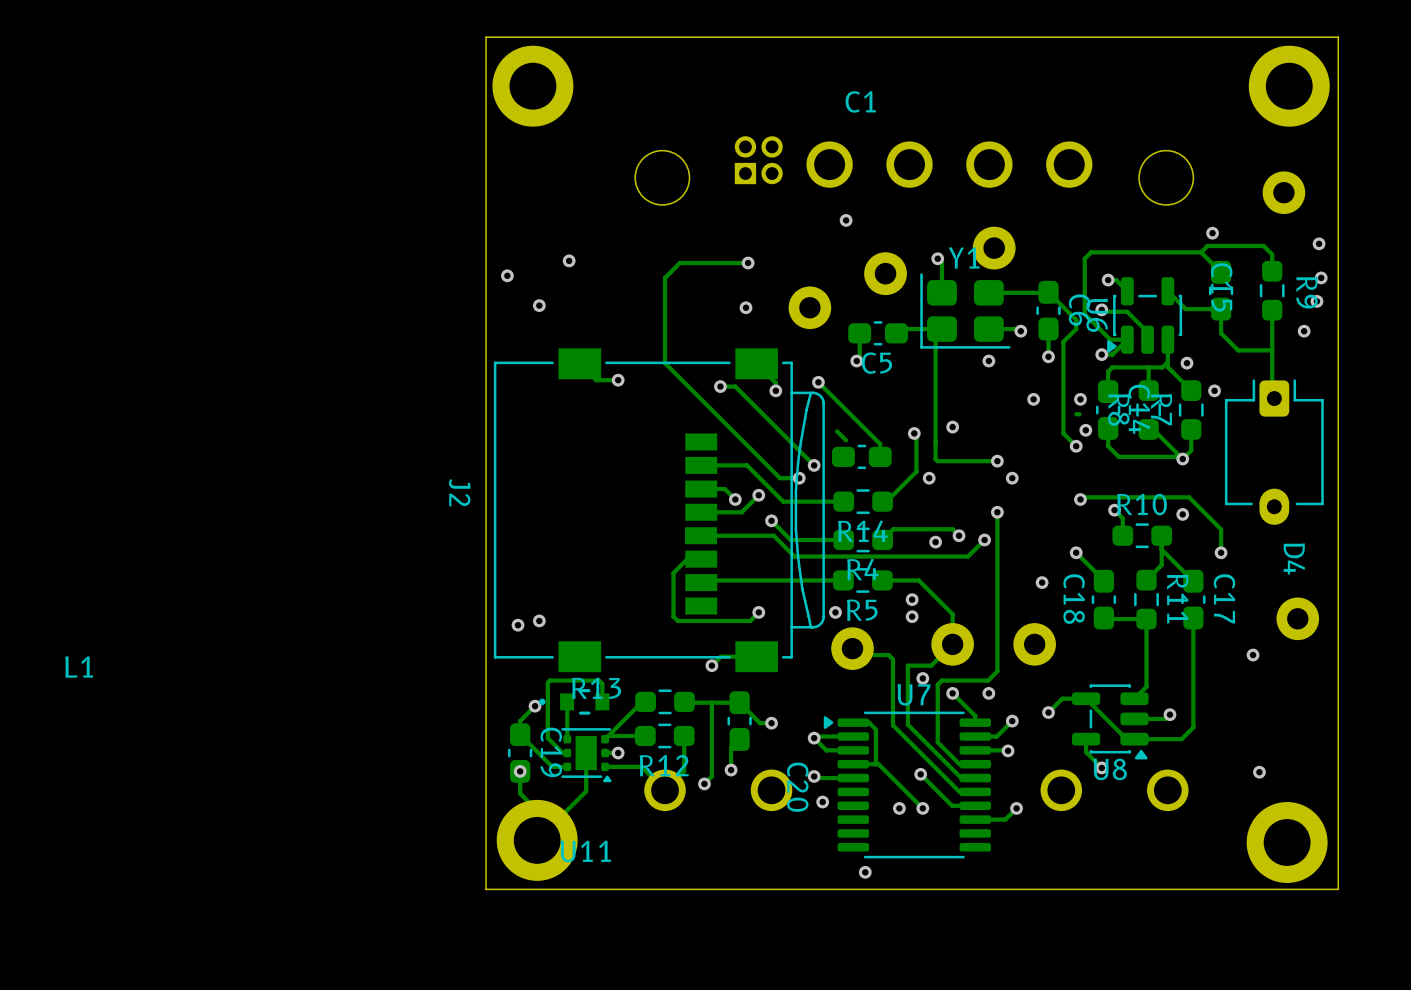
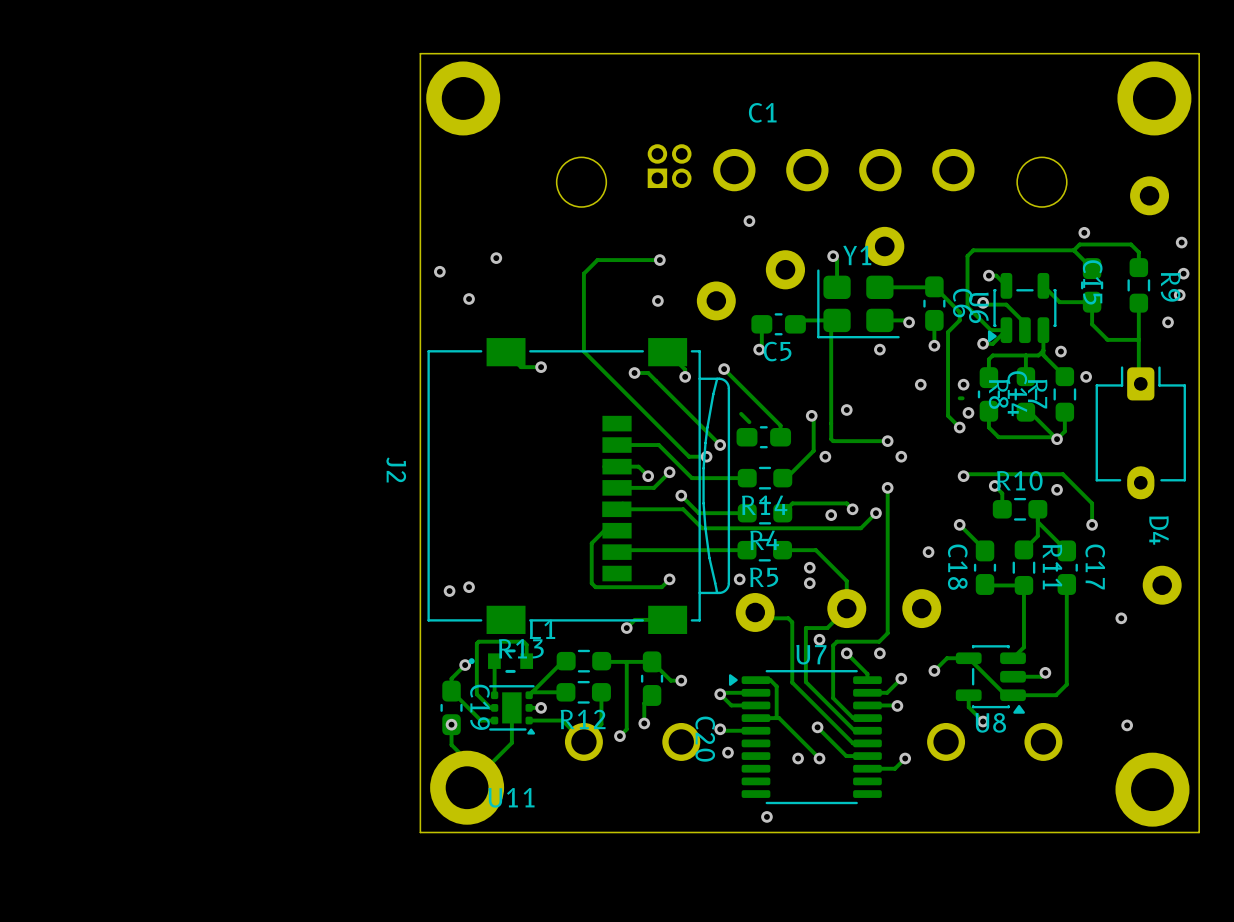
L1 name position: L1 (79, 667) -> L1 (542, 629)

